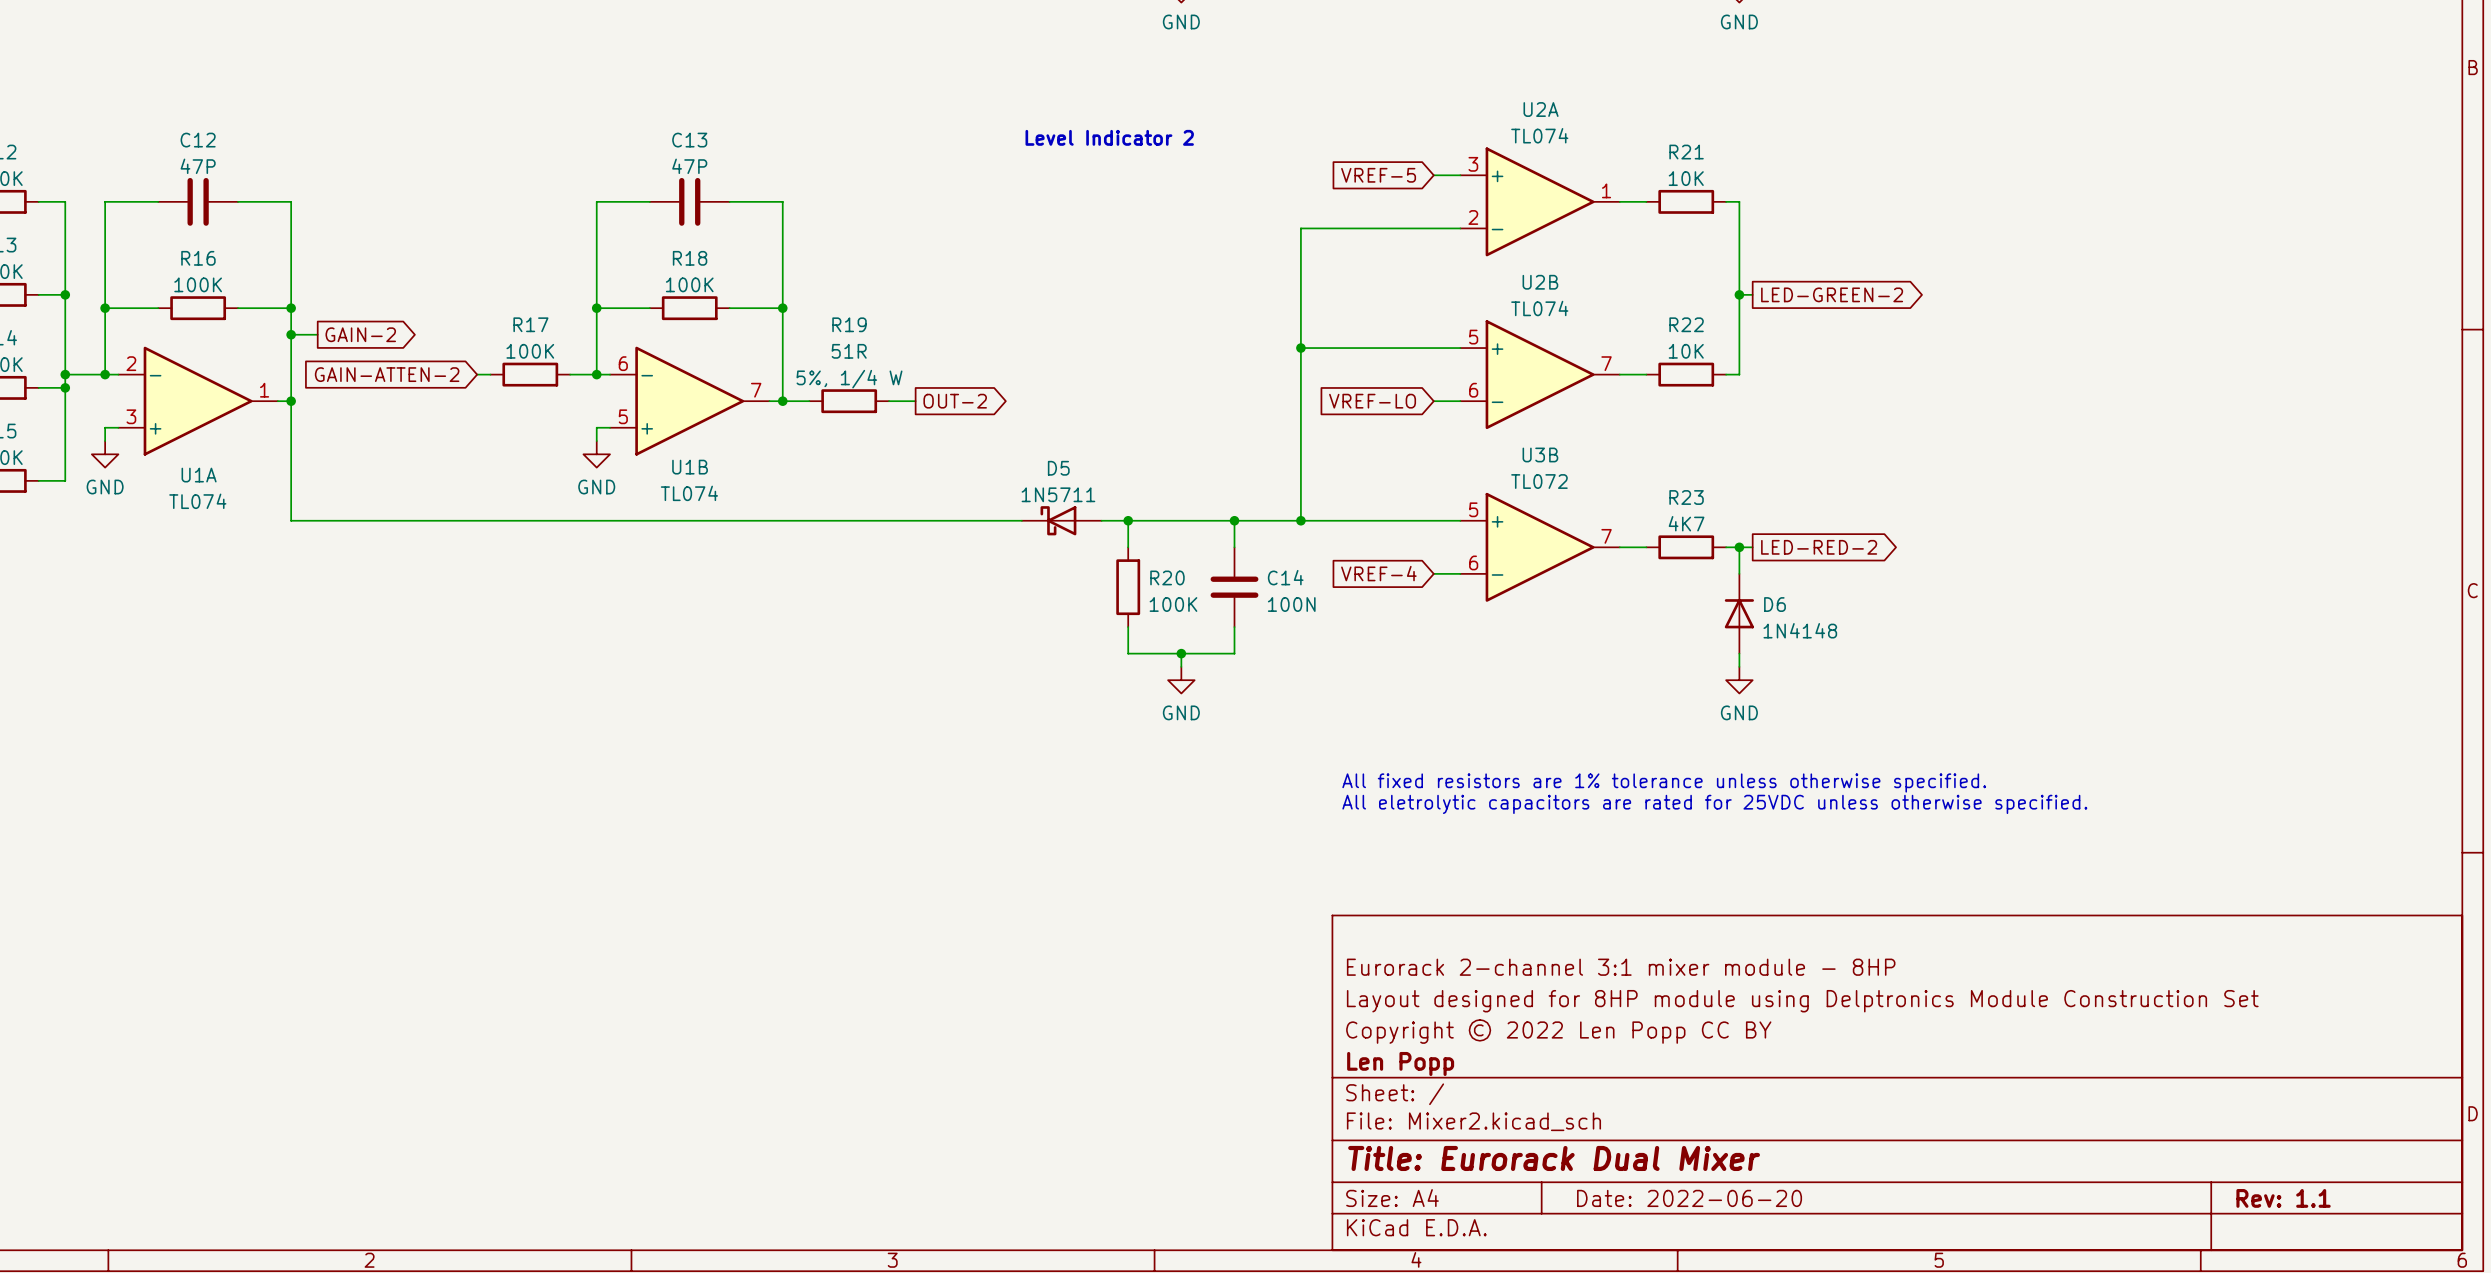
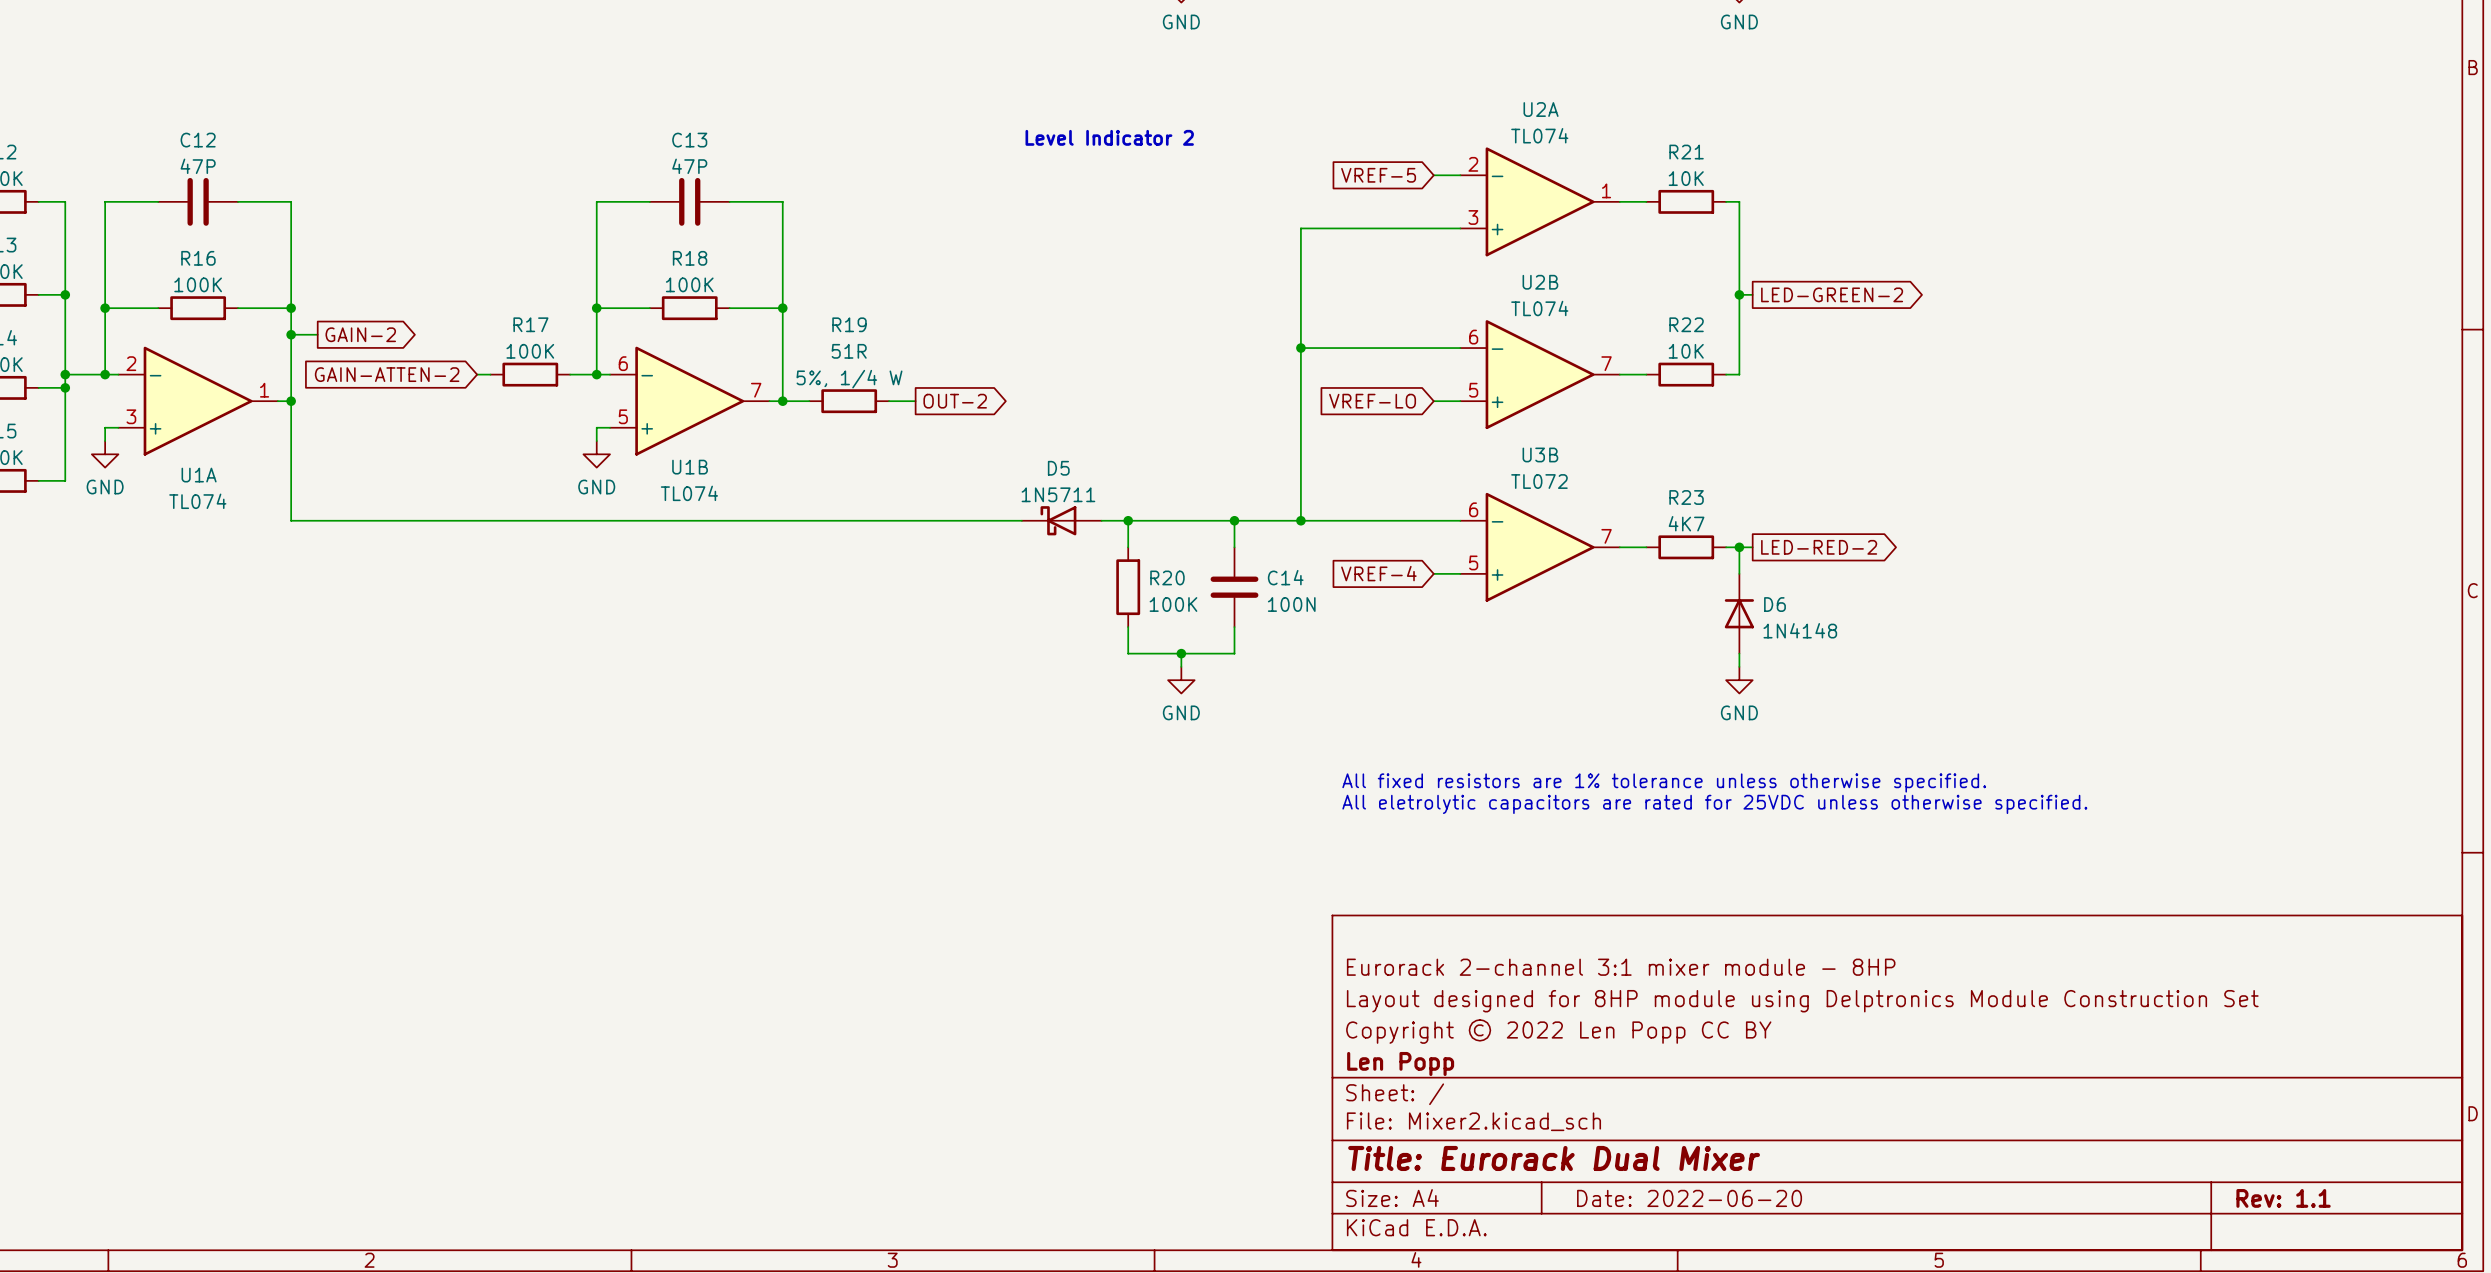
U2A flip: as is (1540, 201) -> up-down (1540, 201)
U2B flip: as is (1540, 374) -> up-down (1540, 374)
U3B flip: as is (1540, 547) -> up-down (1540, 547)

